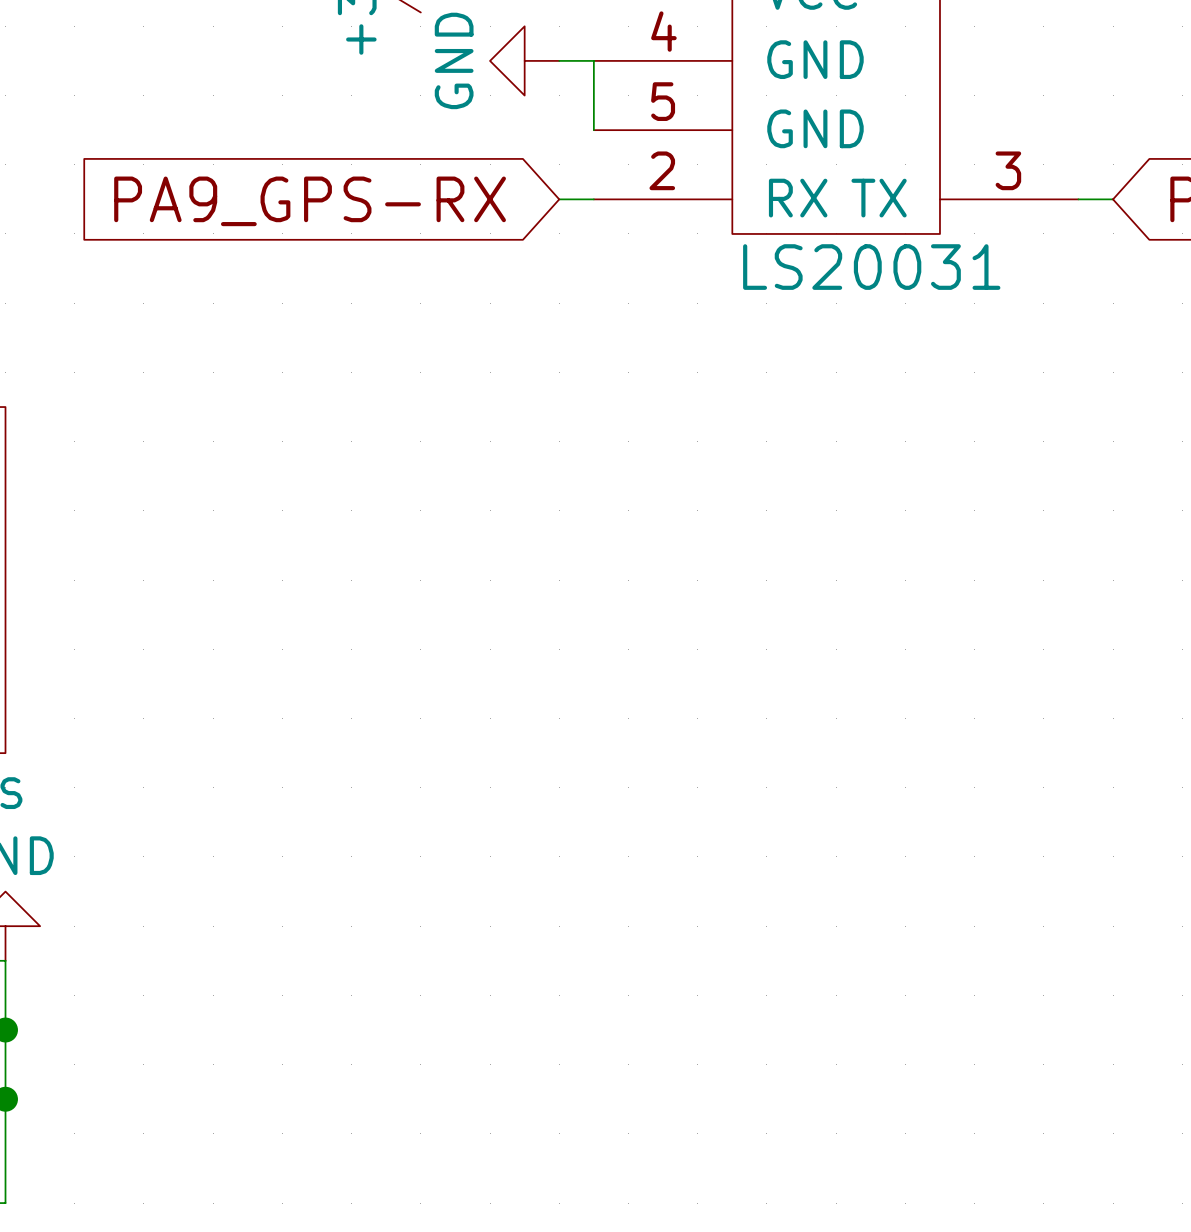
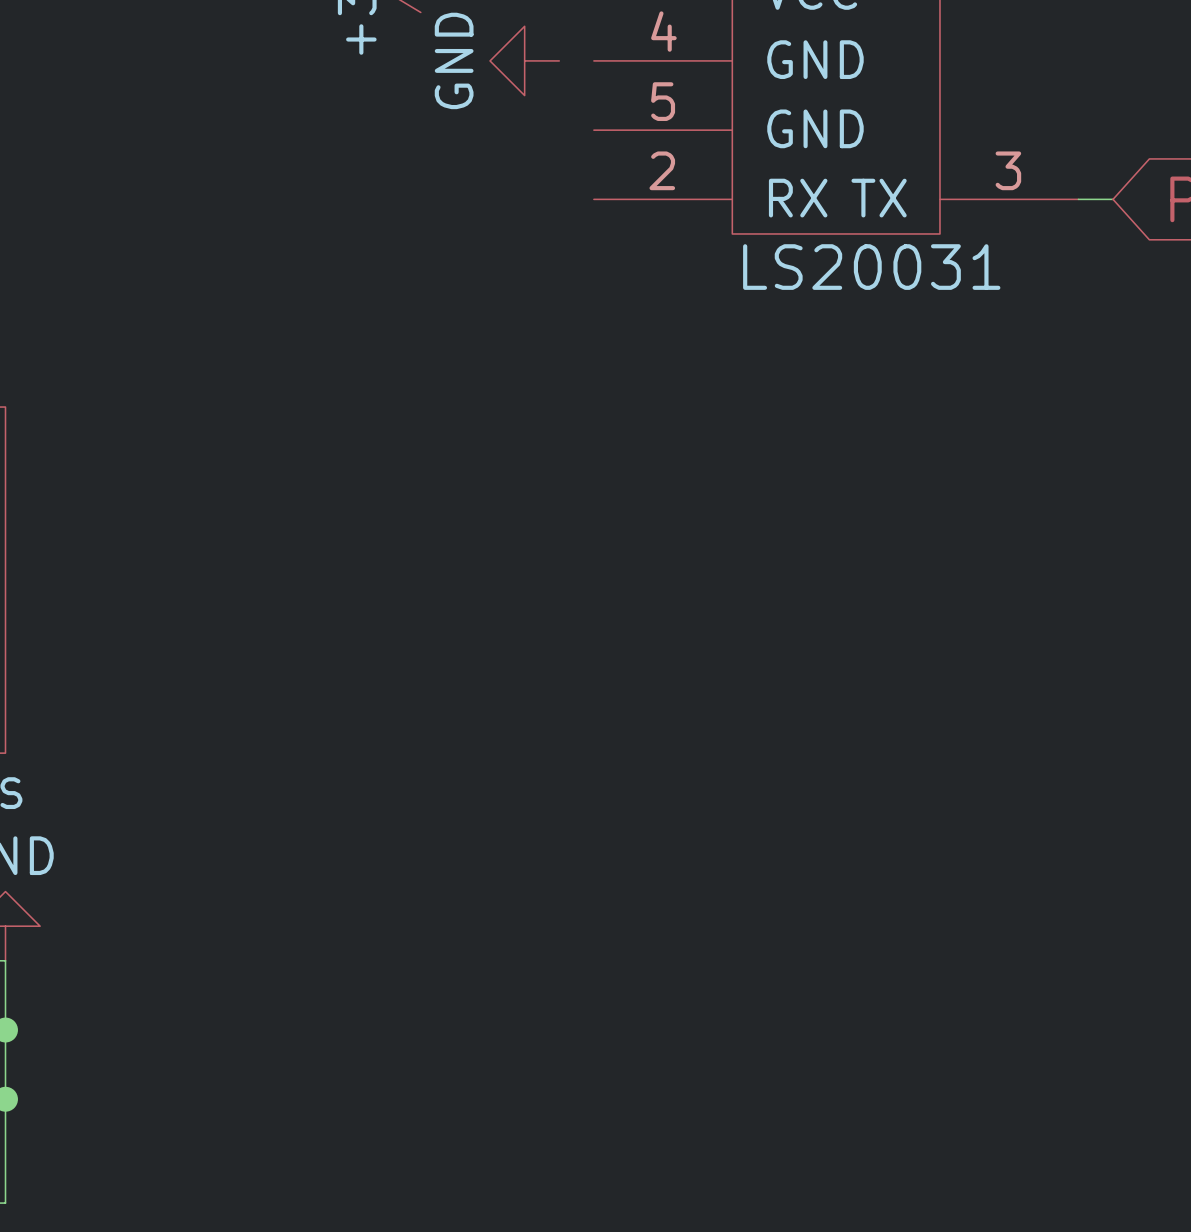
wire: (559, 60) (593, 60) (593, 130) -> none
wire: (559, 199) (593, 199) -> none
global label: PA9_GPS-RX (310, 201) -> none

